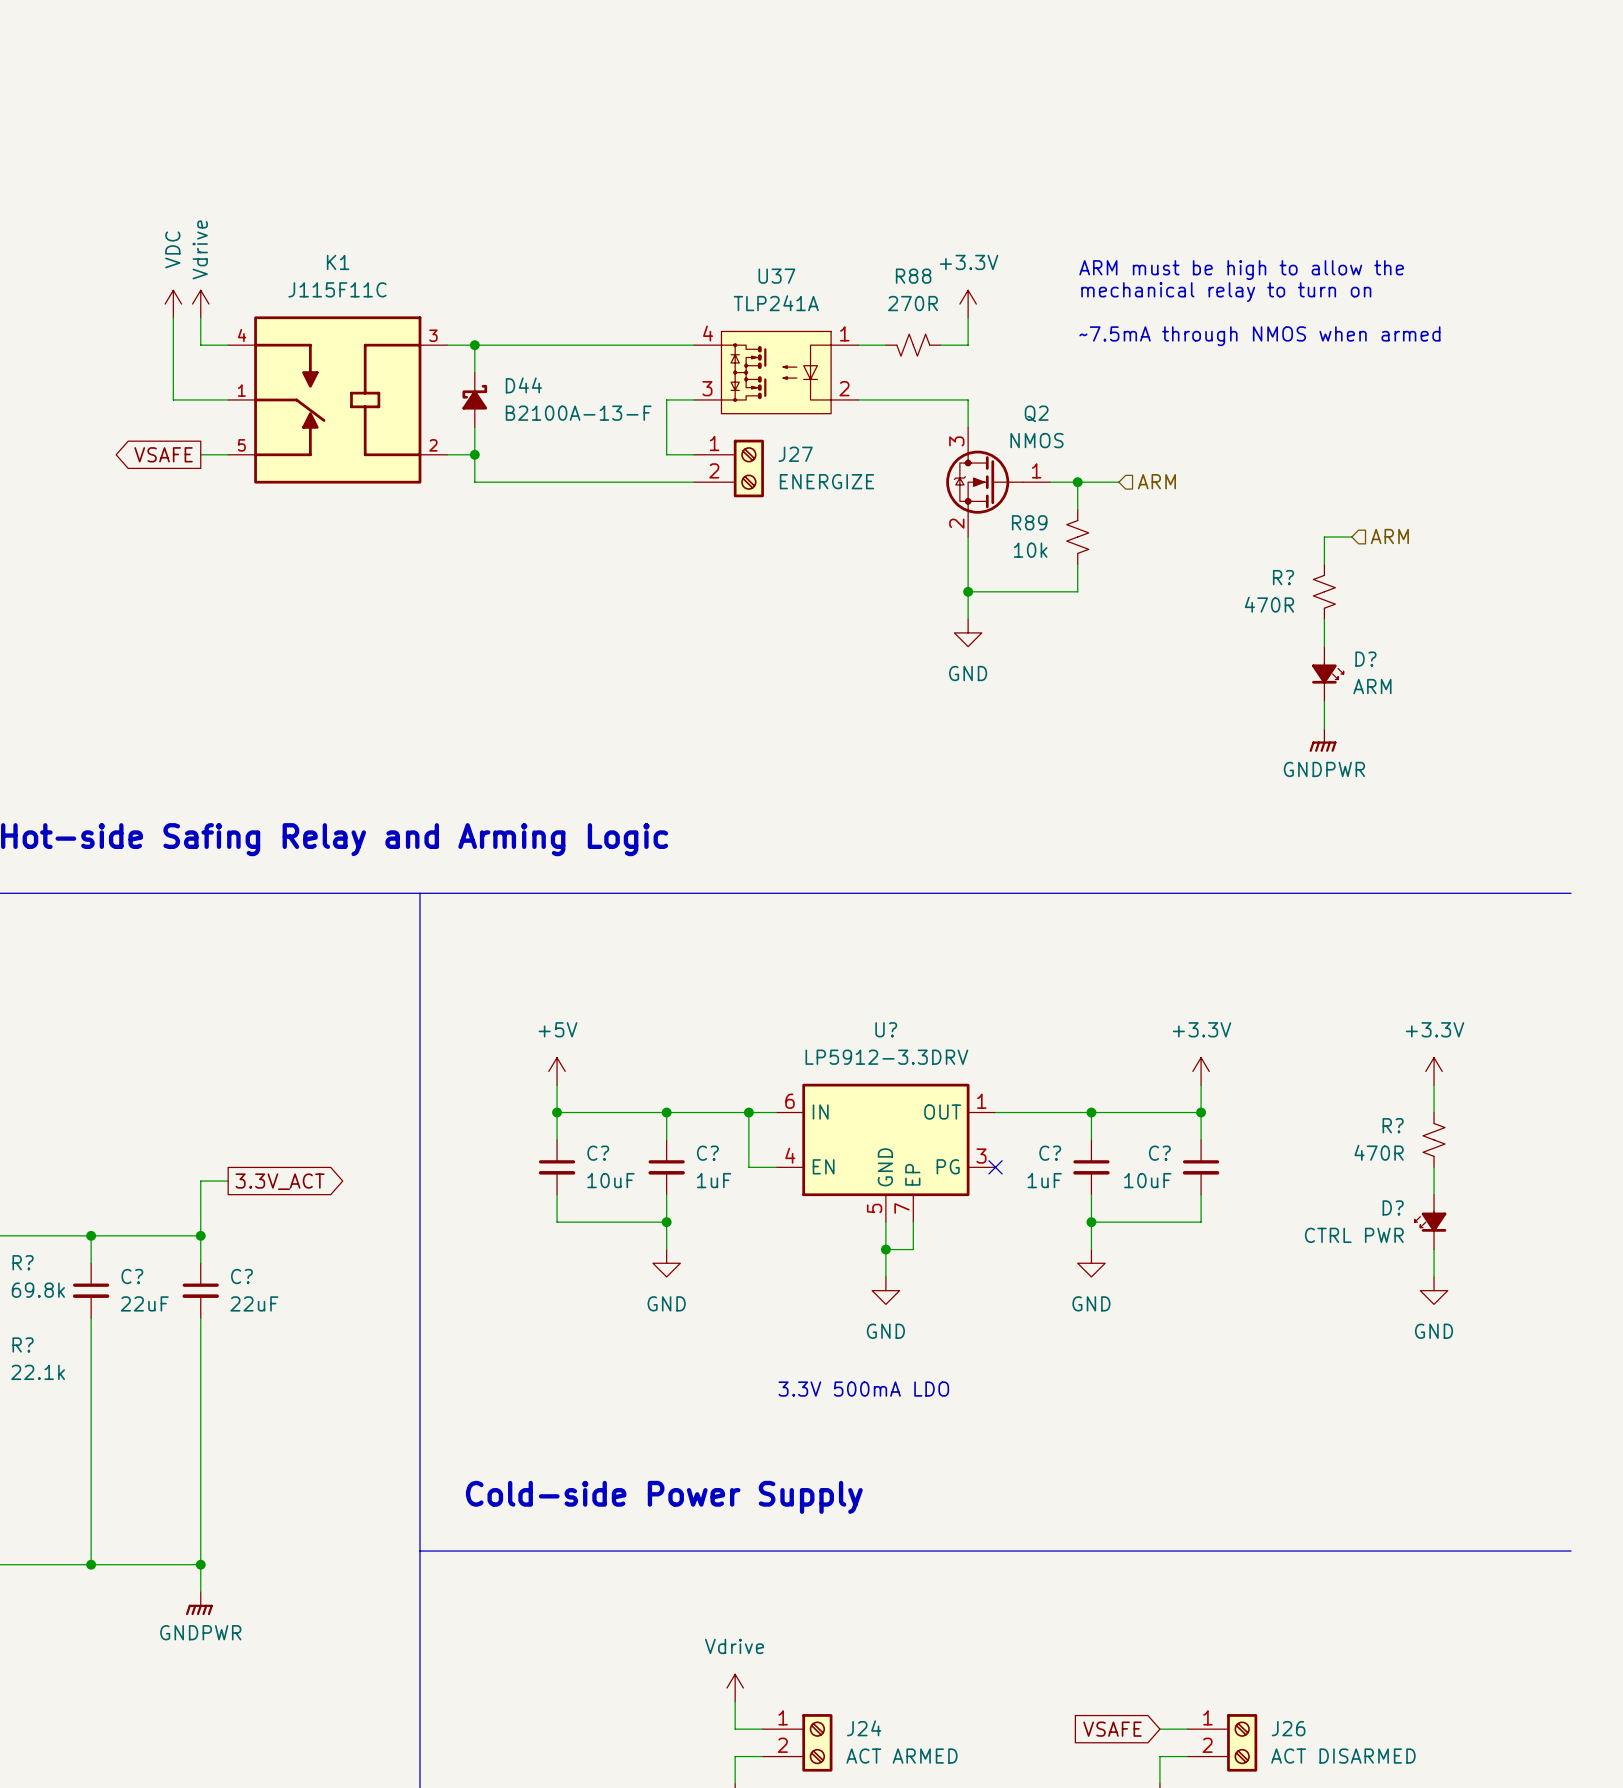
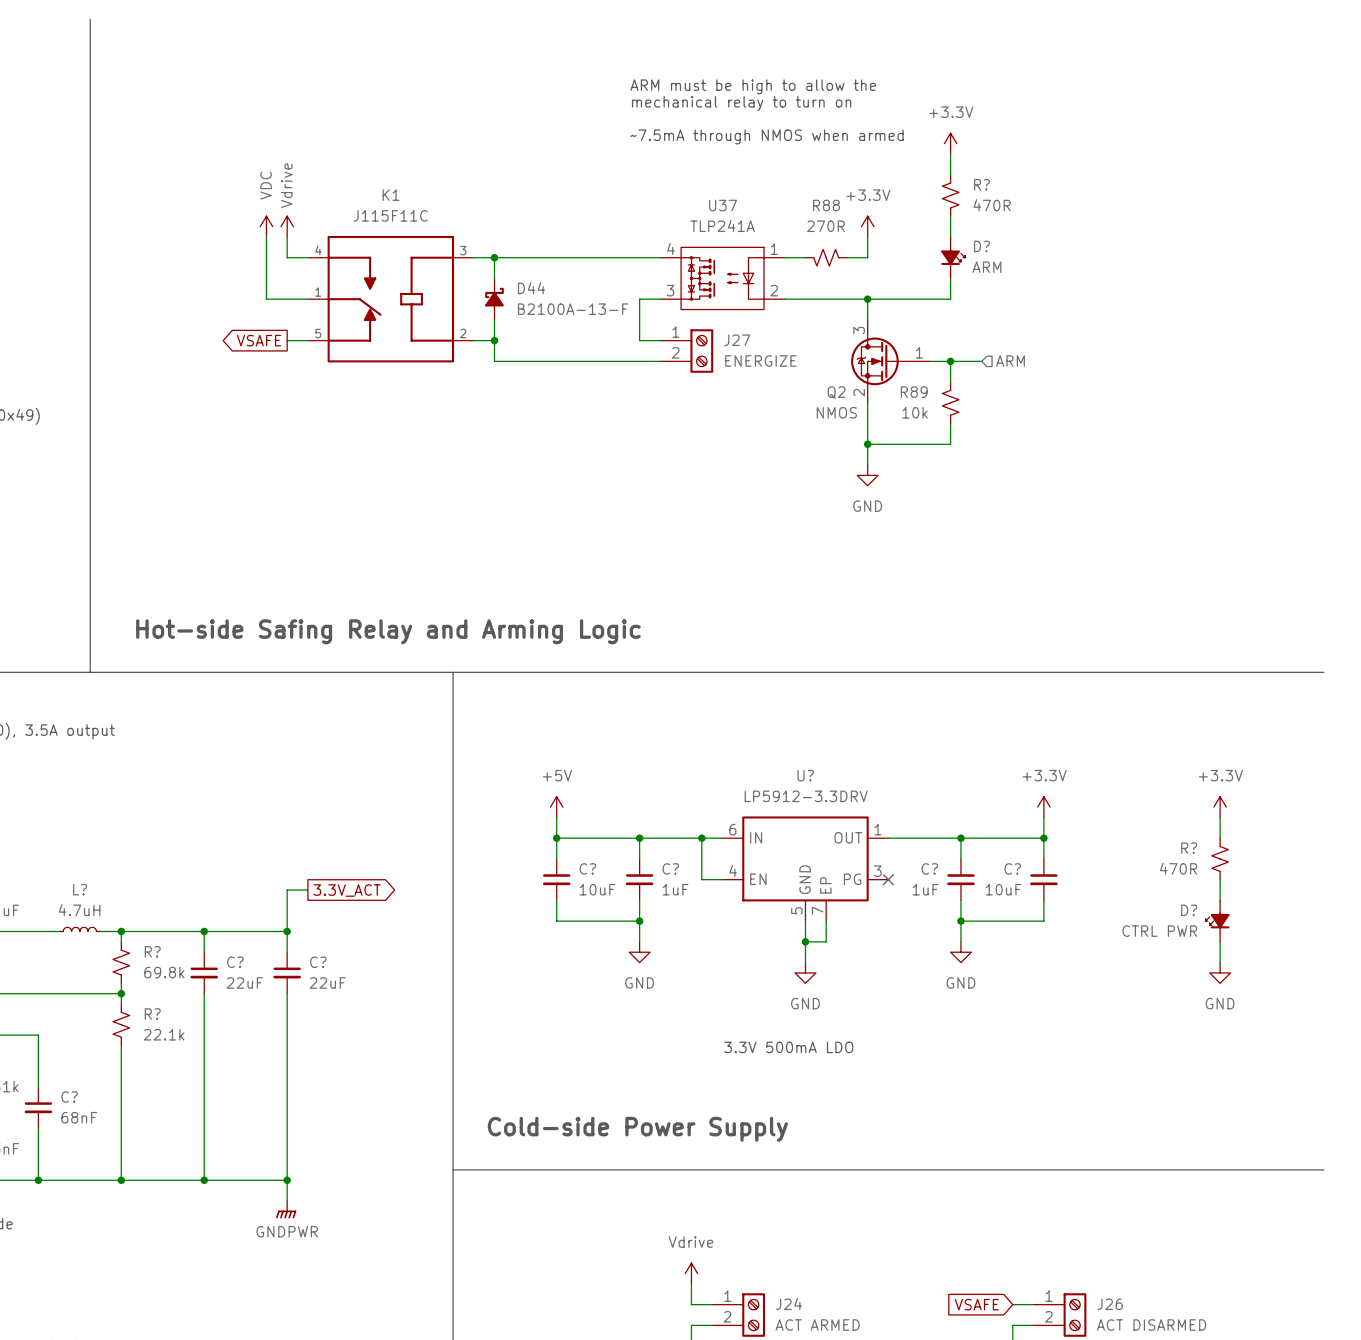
text: none -> ARM must be high to allow the (753, 86)
text: none -> mechanical relay to turn on (741, 103)
text: none -> ~7.5mA through NMOS when armed (767, 136)
power symbol: none -> +3.3V (950, 143)
wire: none -> (950, 154) (950, 174)
R?: none -> 470R (950, 195)
text: ARM must be high to allow the (1241, 270) -> none
wire: none -> (950, 216) (950, 236)
text: mechanical relay to turn on (1226, 292) -> none
text: ~7.5mA through NMOS when armed (1259, 336) -> none
D?: none -> ARM (953, 257)
wire: none -> (950, 278) (950, 299) (867, 299)
junction: none -> (867, 299)
Q2 name position: Q2 (1036, 413) -> Q2 (836, 392)
Q2 value position: NMOS (1036, 440) -> NMOS (836, 412)
hierarchical label: ARM (1389, 536) -> none
wire: (1351, 537) (1324, 537) (1324, 564) -> none
R?: 470R (1324, 591) -> none
wire: (1324, 619) (1324, 646) -> none
D?: ARM (1327, 674) -> none
wire: (1324, 701) (1324, 728) -> none
power symbol: GNDPWR (1323, 740) -> none

